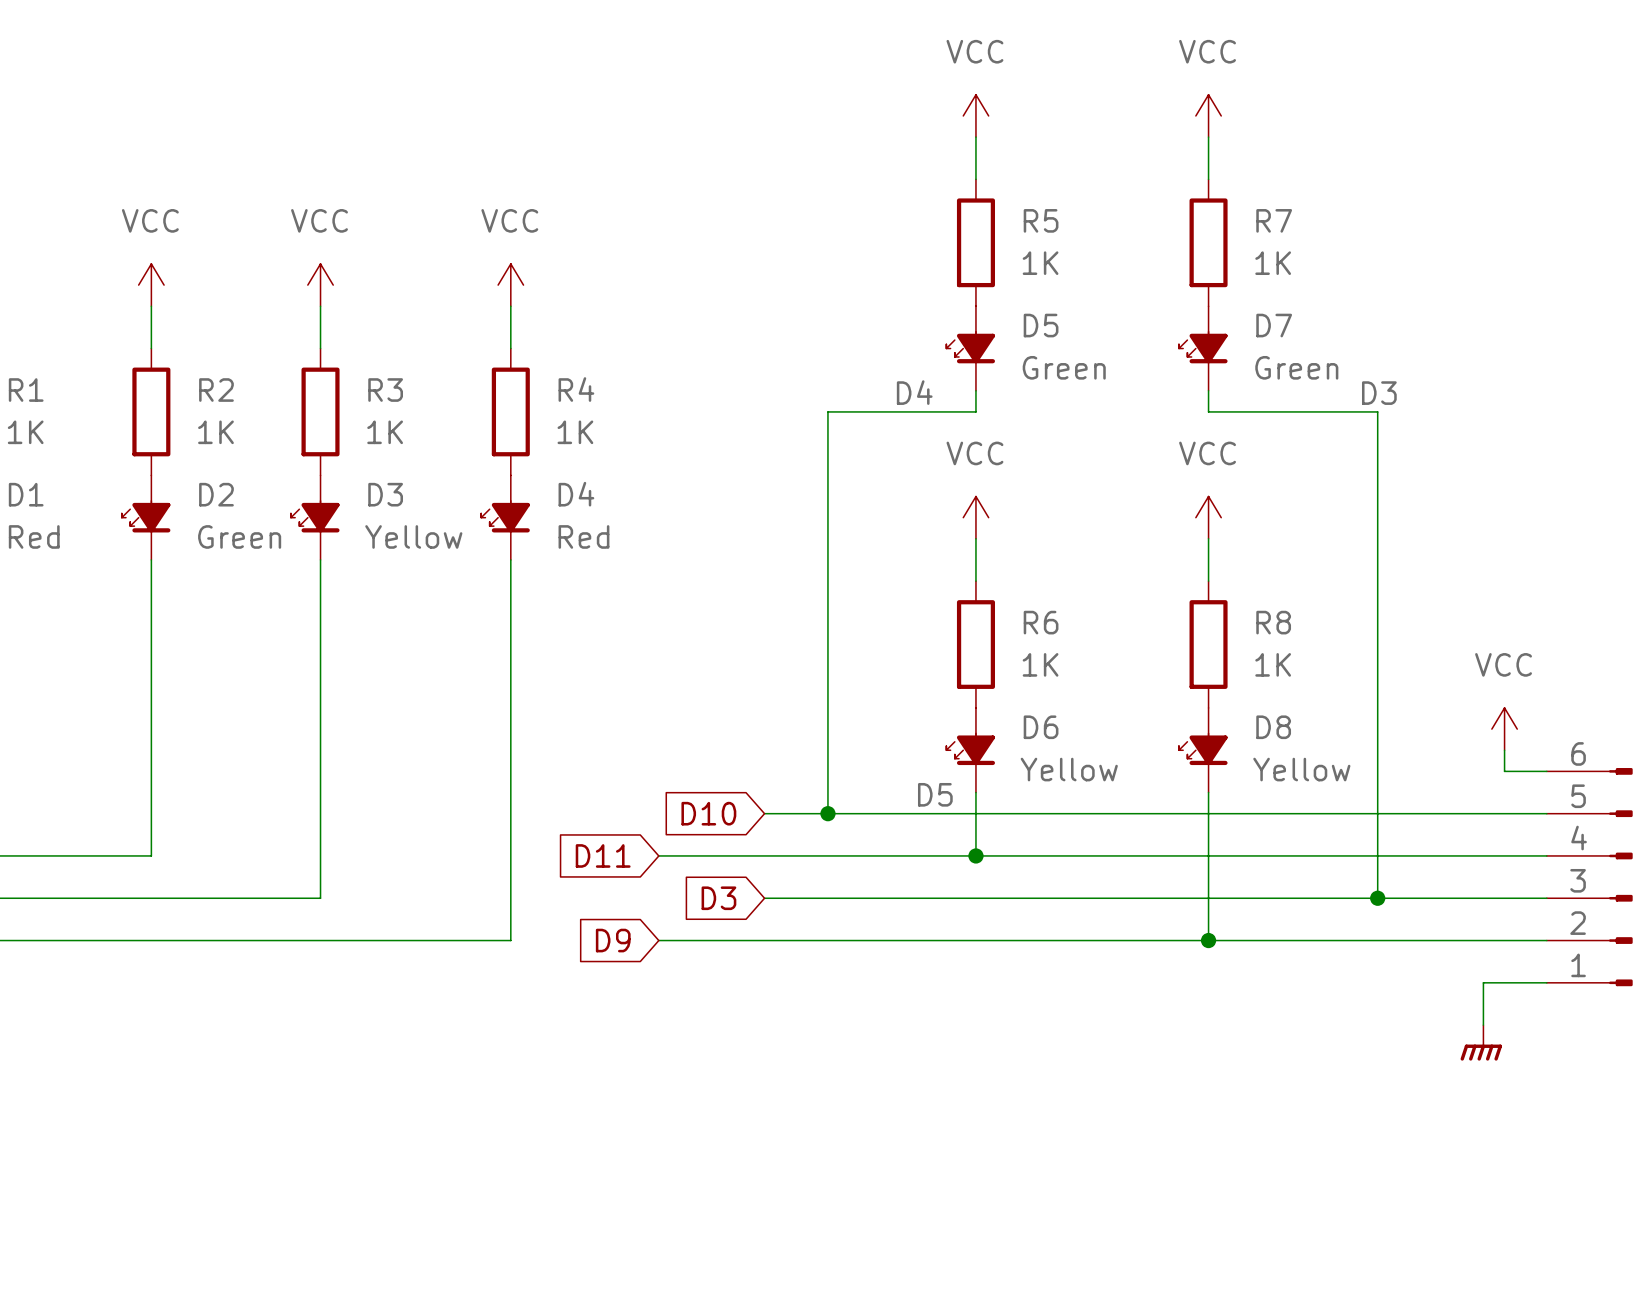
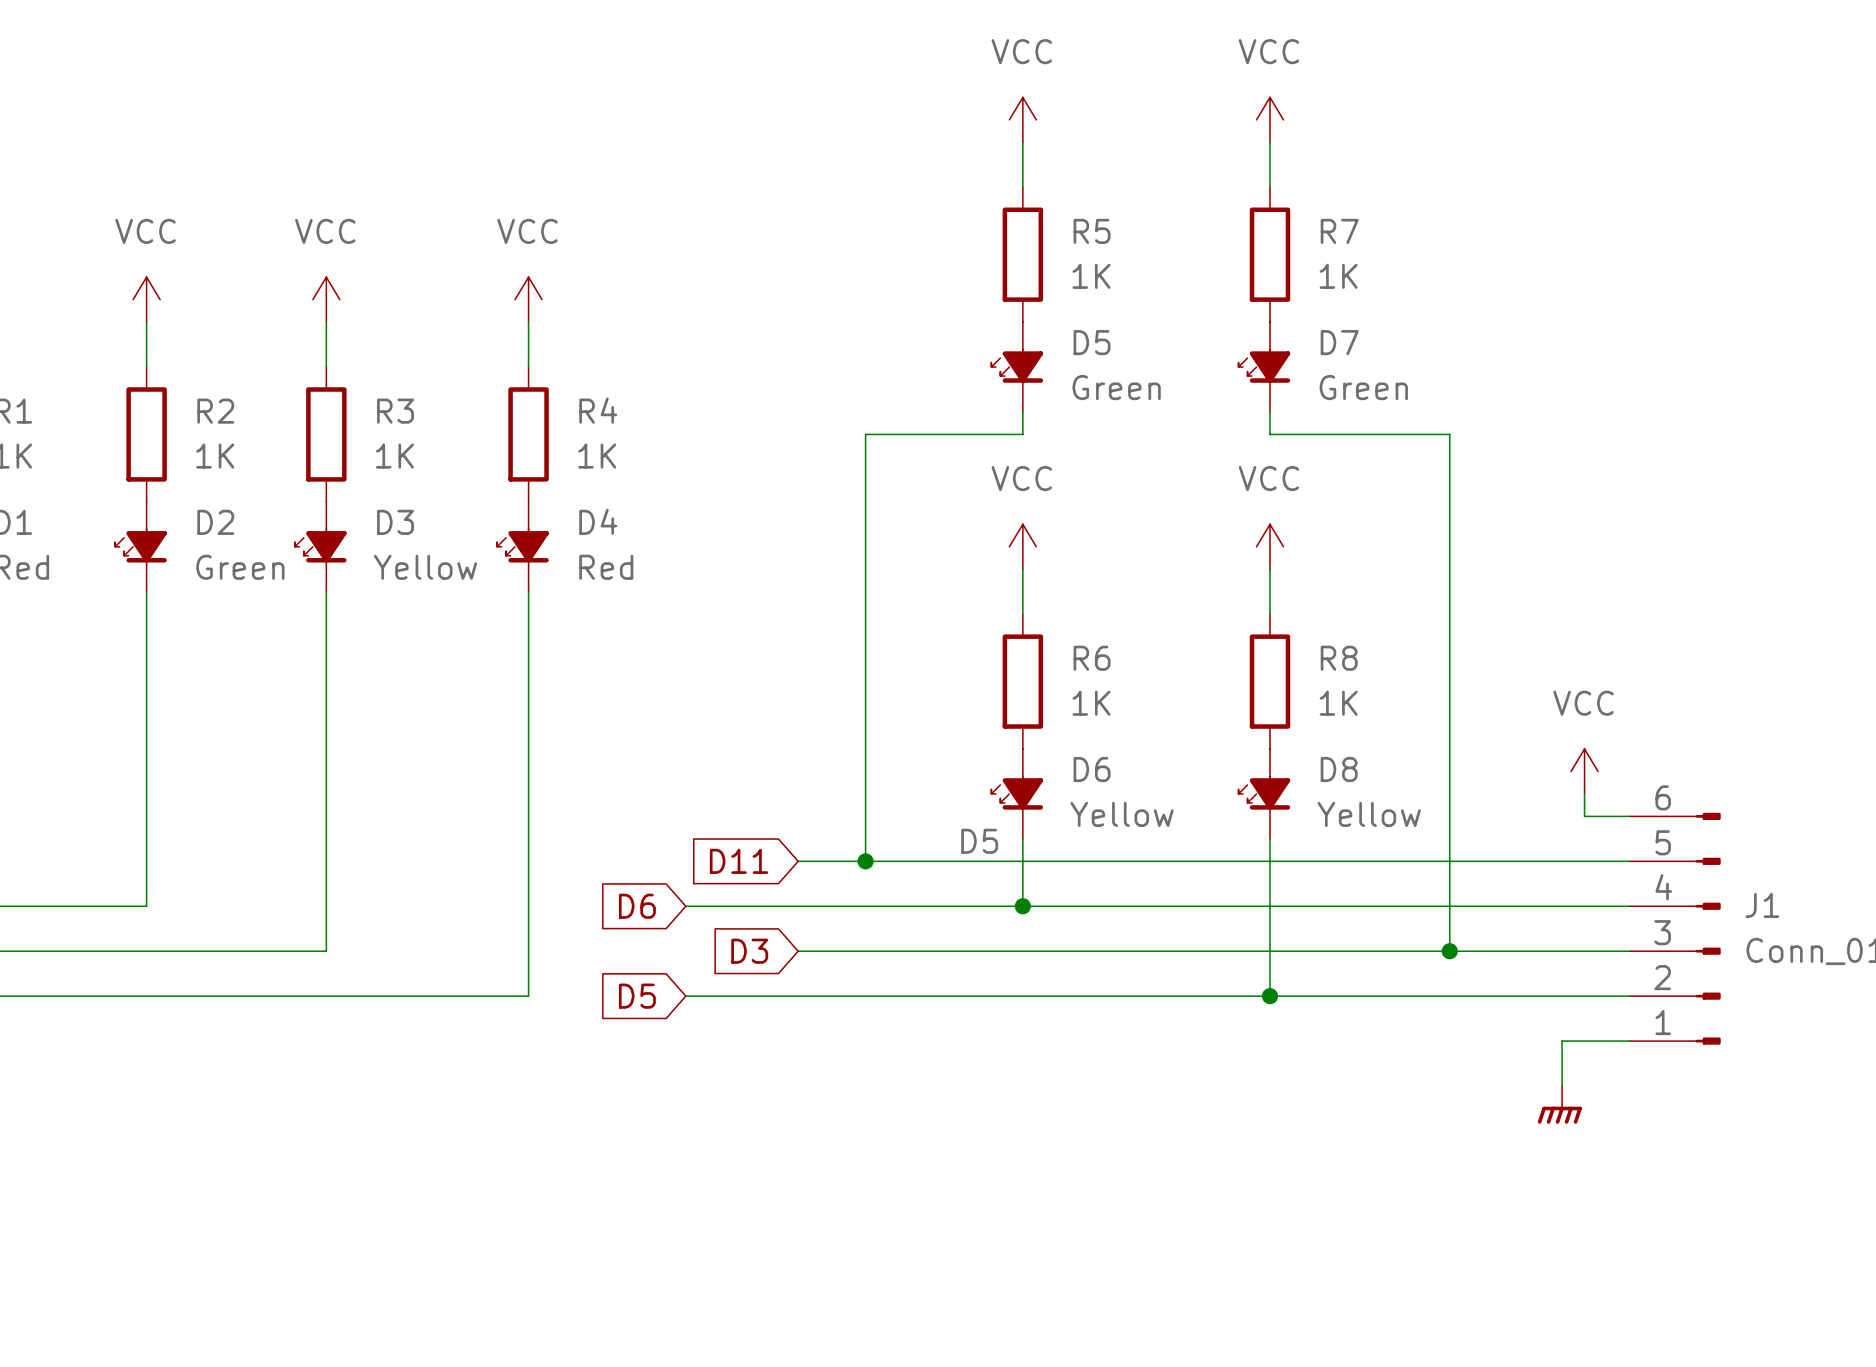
label: D4 (914, 392) -> none
label: D3 (1379, 393) -> none
global label: D10 (708, 813) -> D11 (739, 861)
global label: D11 (603, 855) -> D6 (637, 906)
global label: D9 (613, 940) -> D5 (637, 996)

